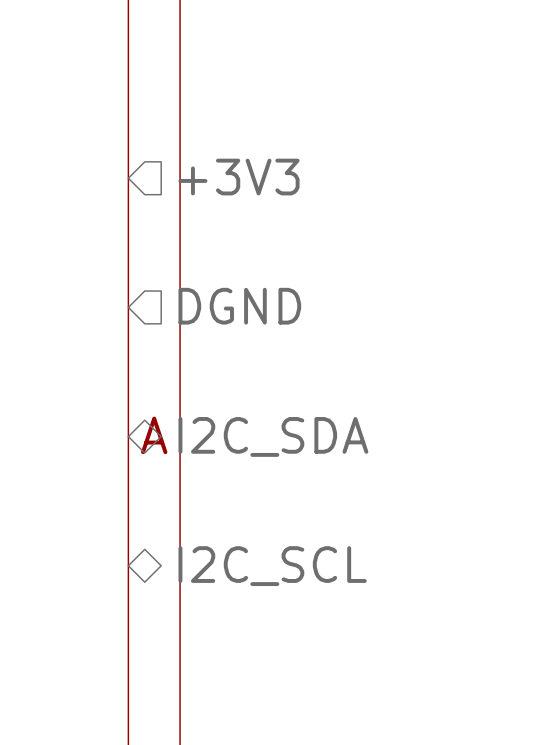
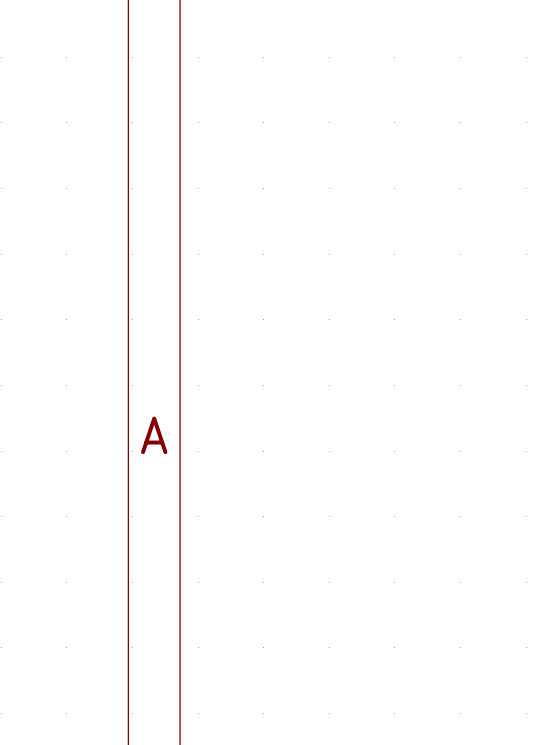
hierarchical label: +3V3 (239, 177) -> none
hierarchical label: DGND (239, 306) -> none
hierarchical label: I2C_SDA (273, 436) -> none
hierarchical label: I2C_SCL (272, 566) -> none

